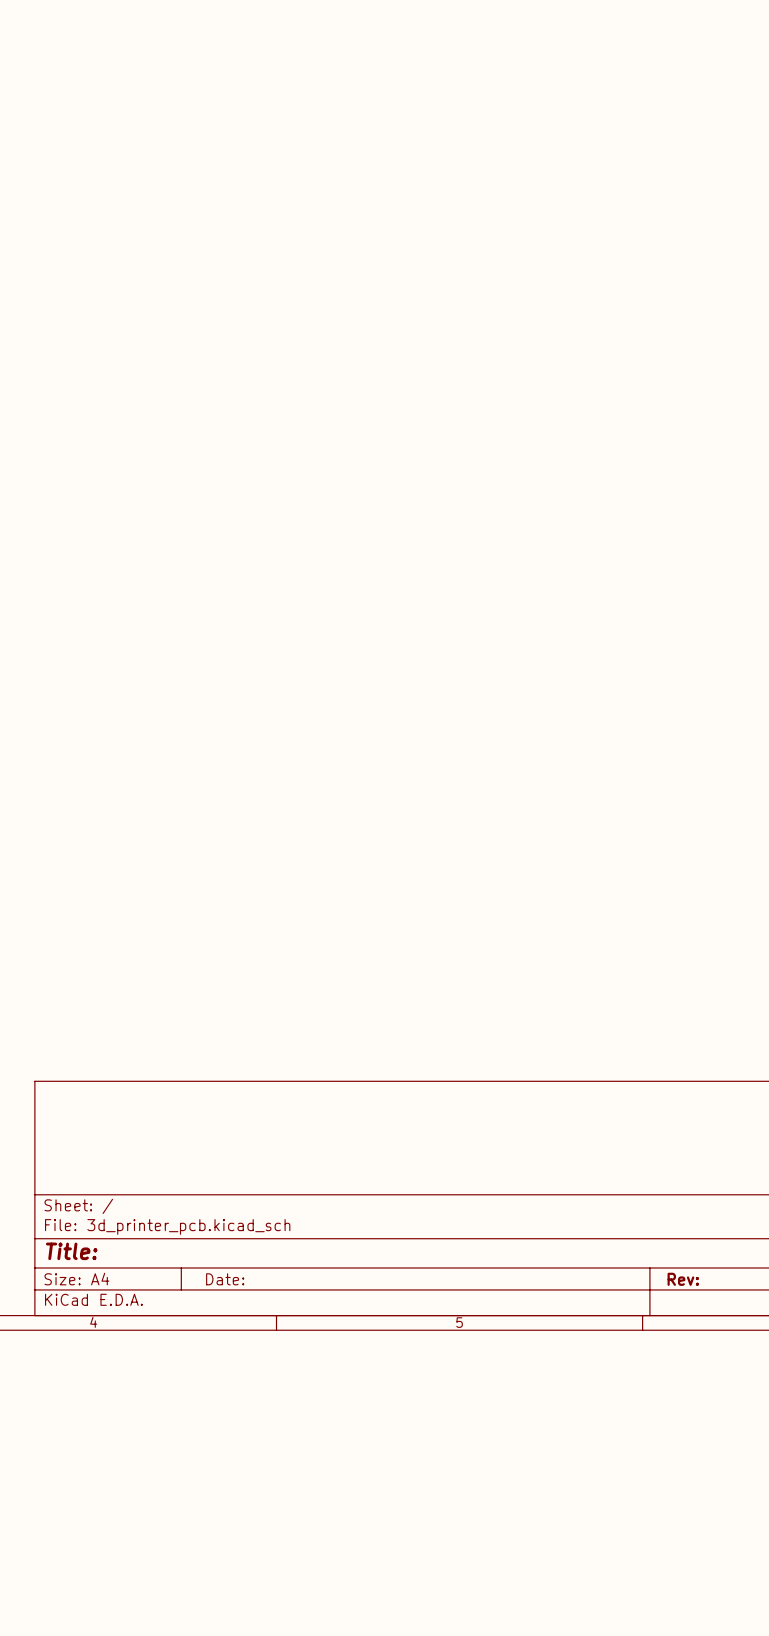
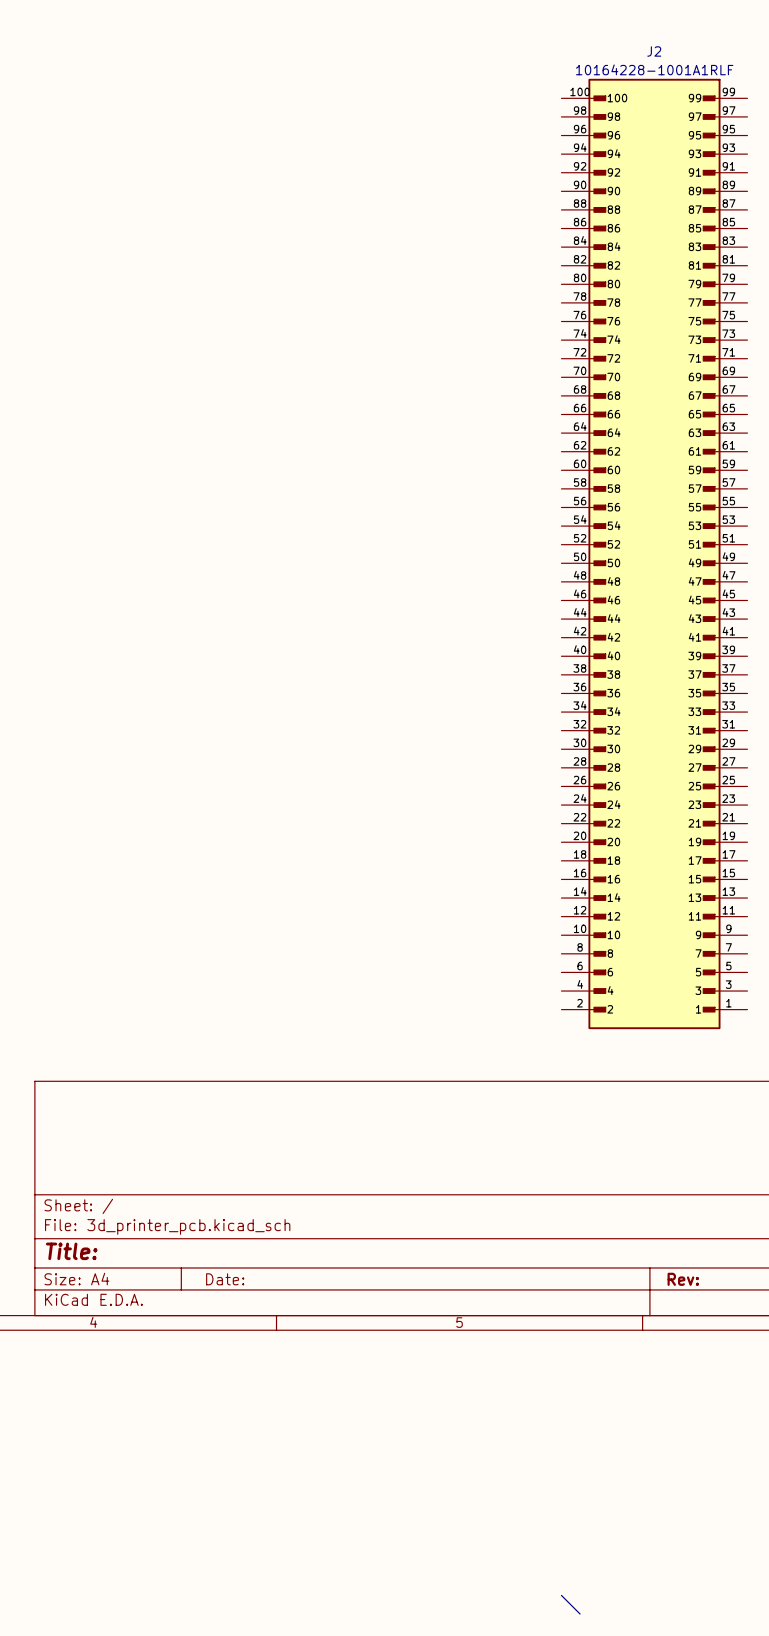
J2: none -> 10164228-1001A1RLF (654, 553)
wire: none -> (561, 1595) (580, 1614)

